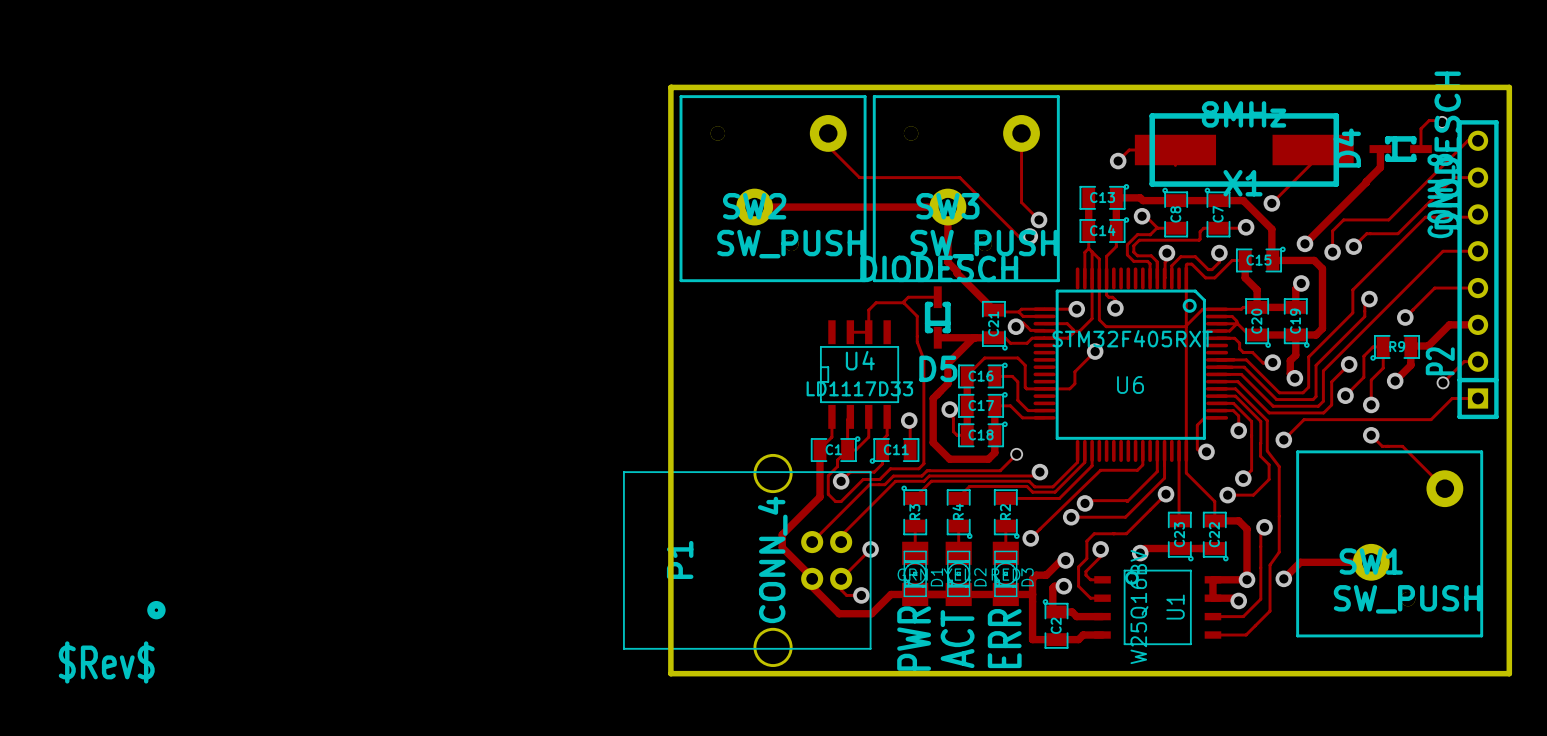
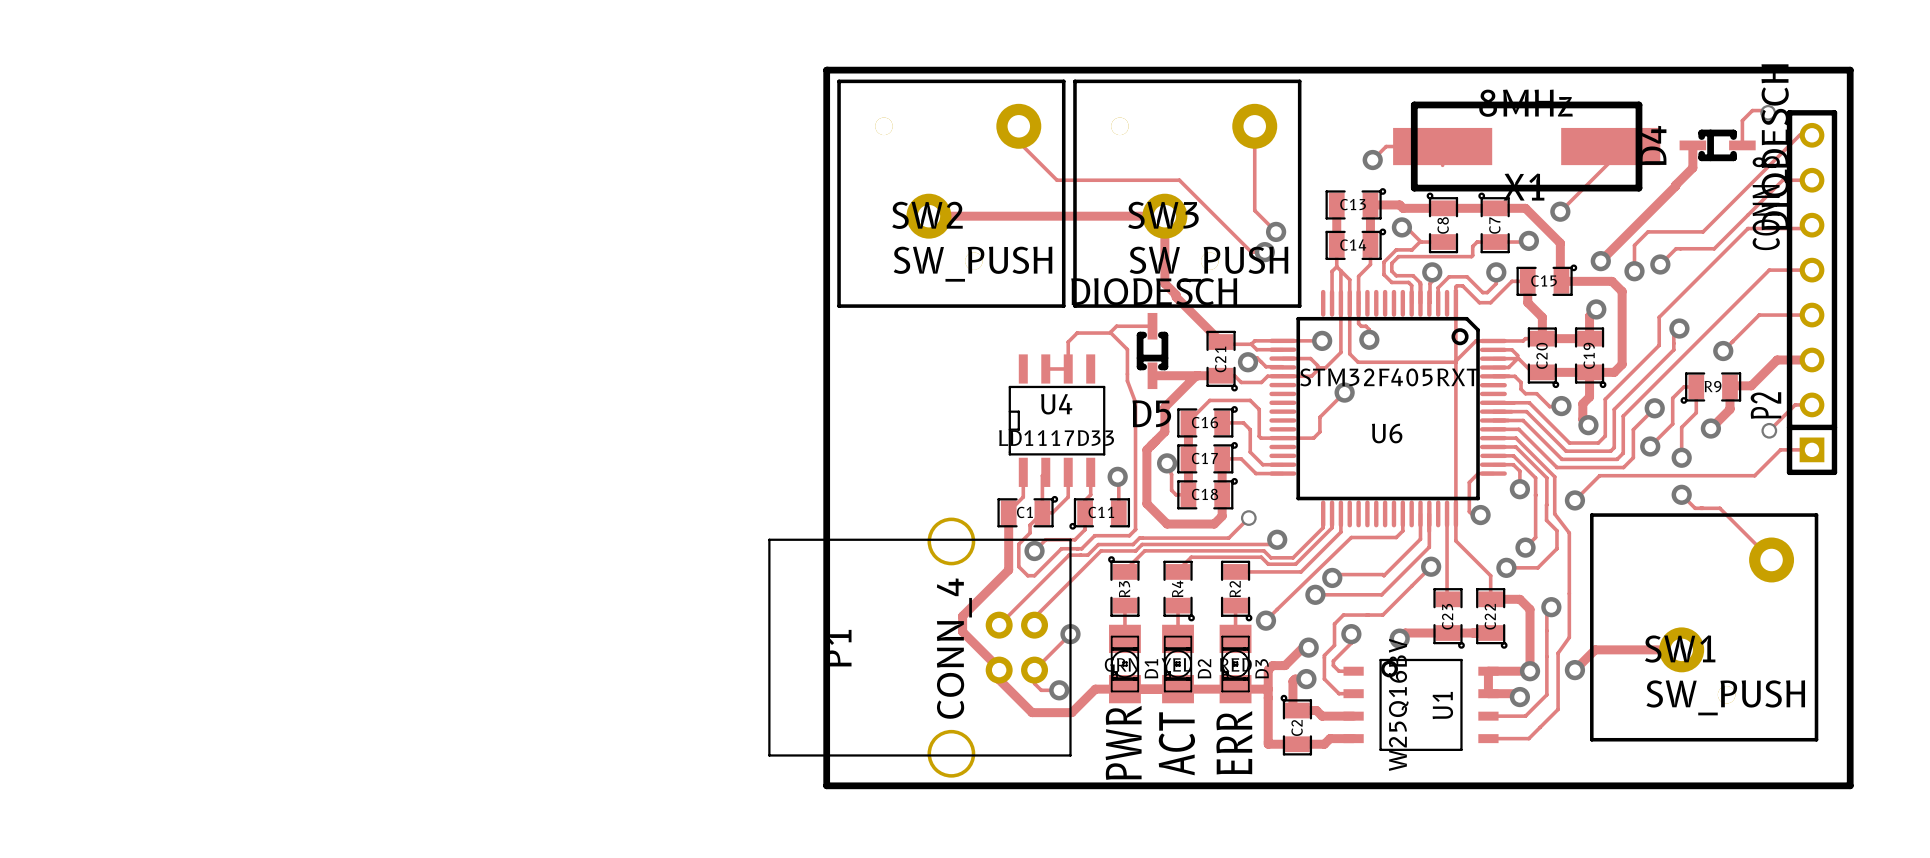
drawing: [147, 600, 166, 620] -> none
text: $Rev$ (106, 662) -> none

